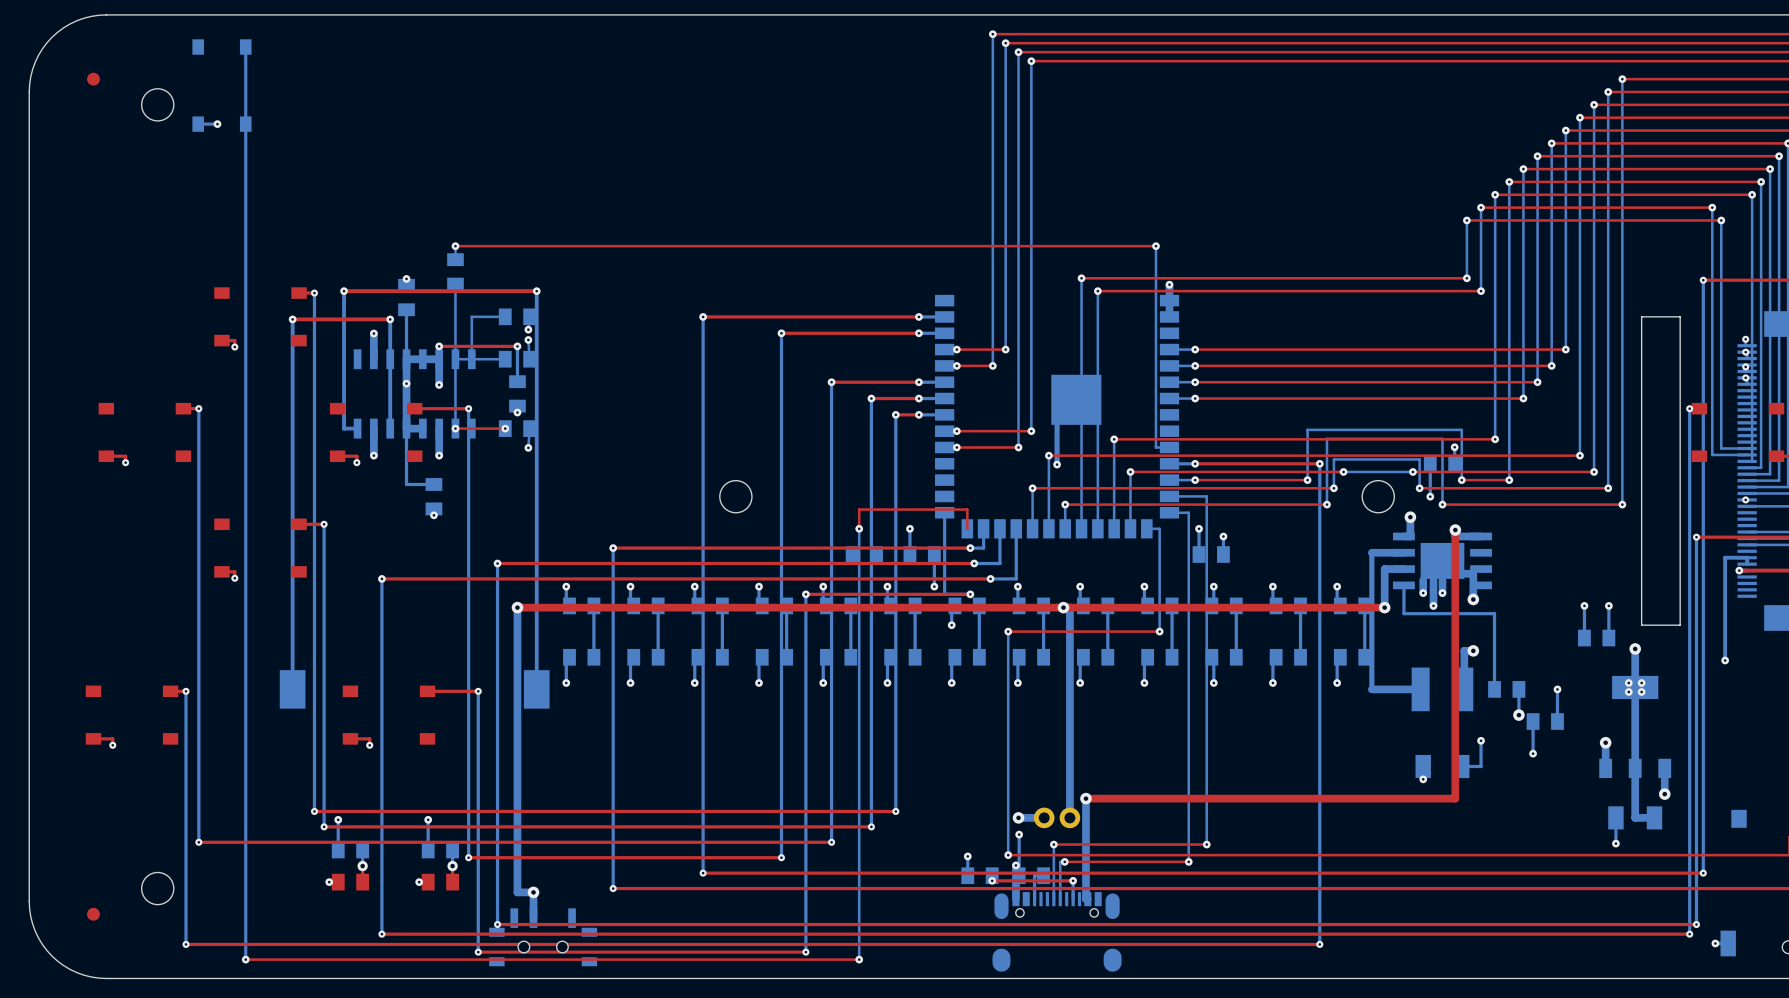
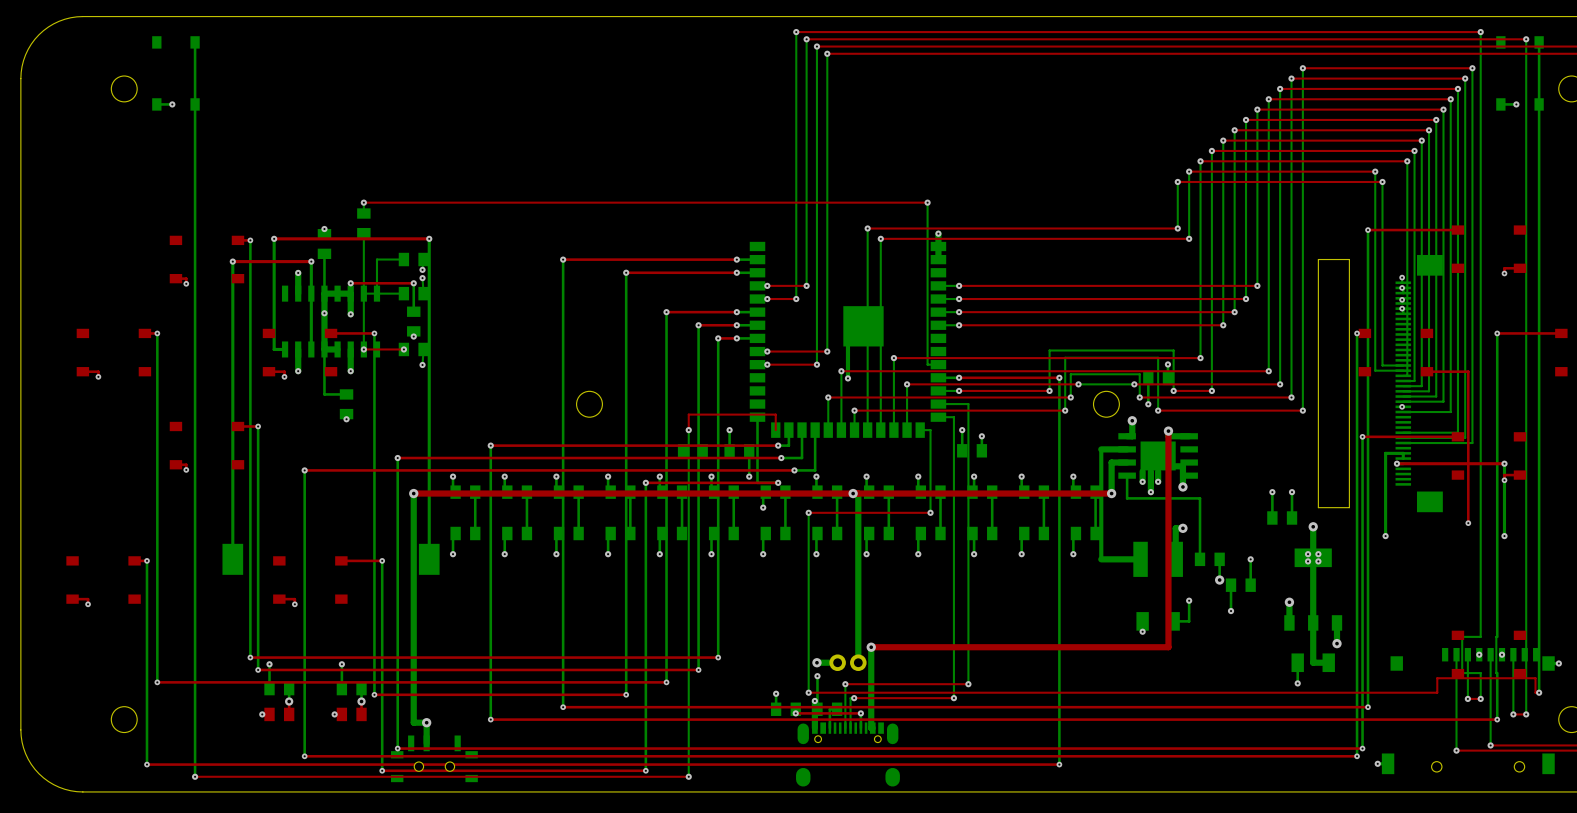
part: (93, 79) -> none
part: (93, 914) -> none

